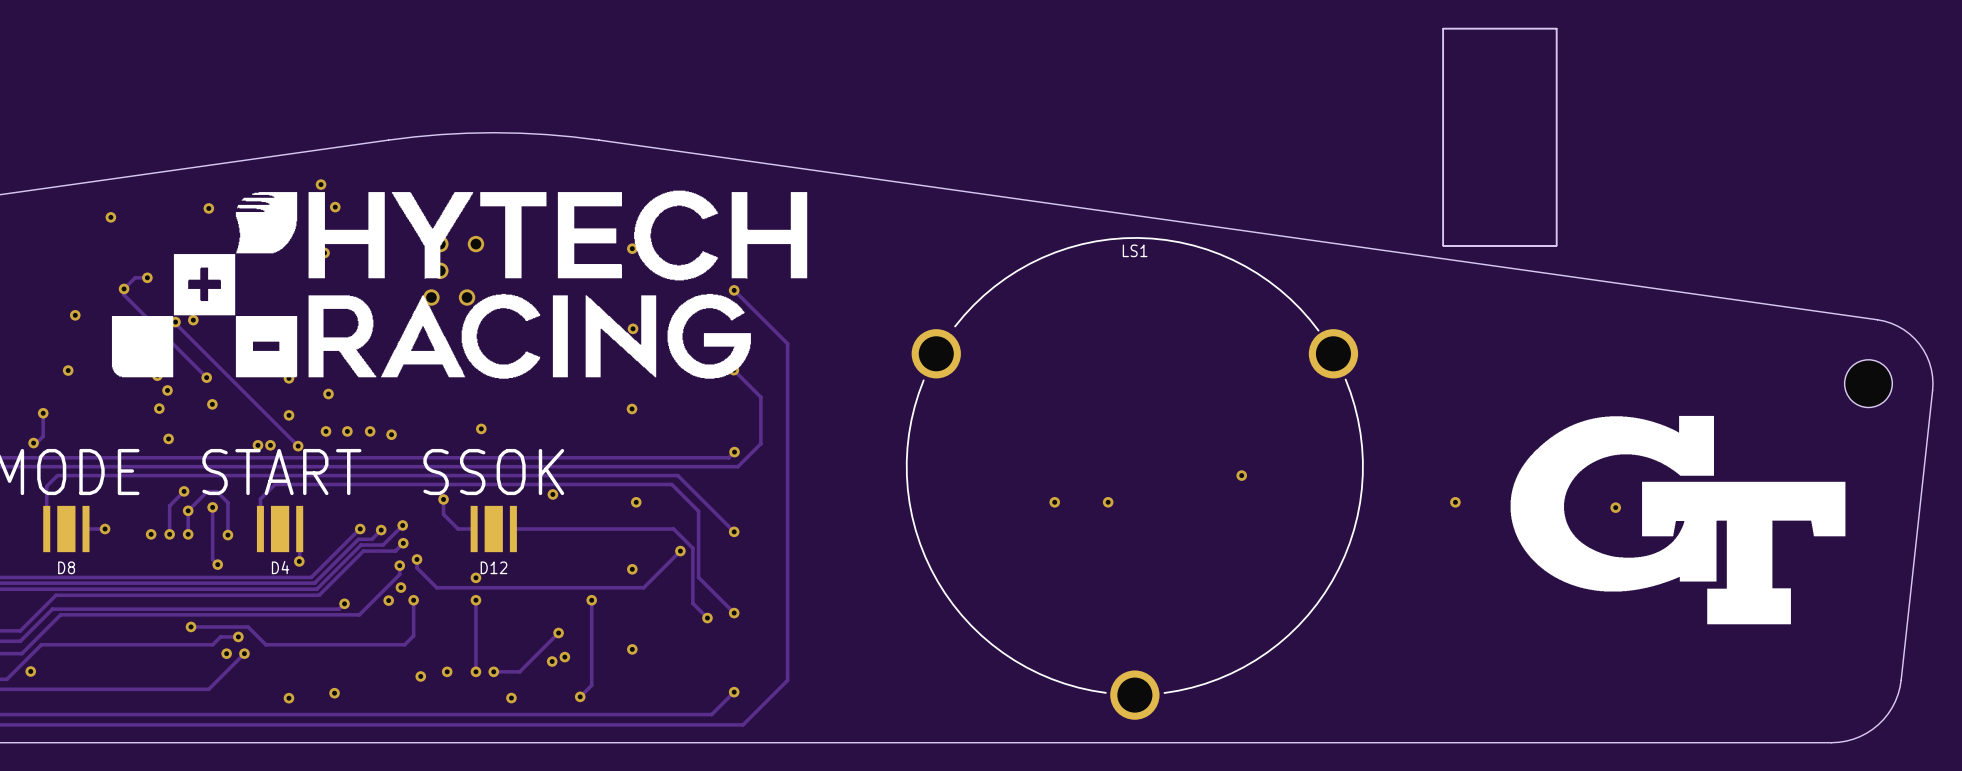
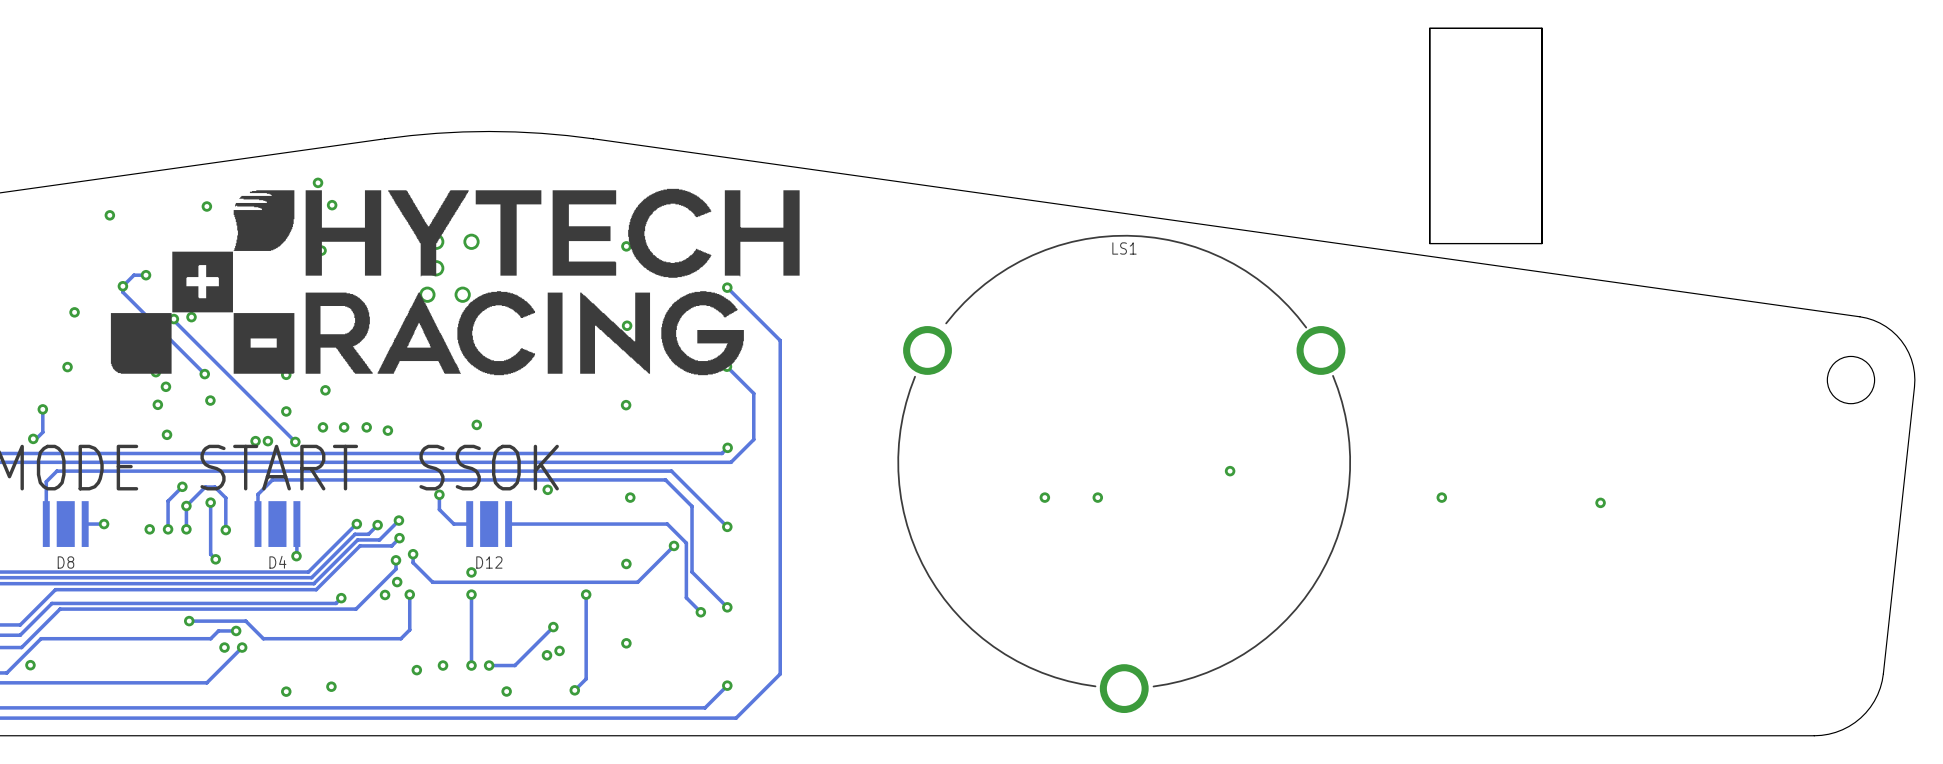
drawing: [1510, 415, 1846, 625] -> none

